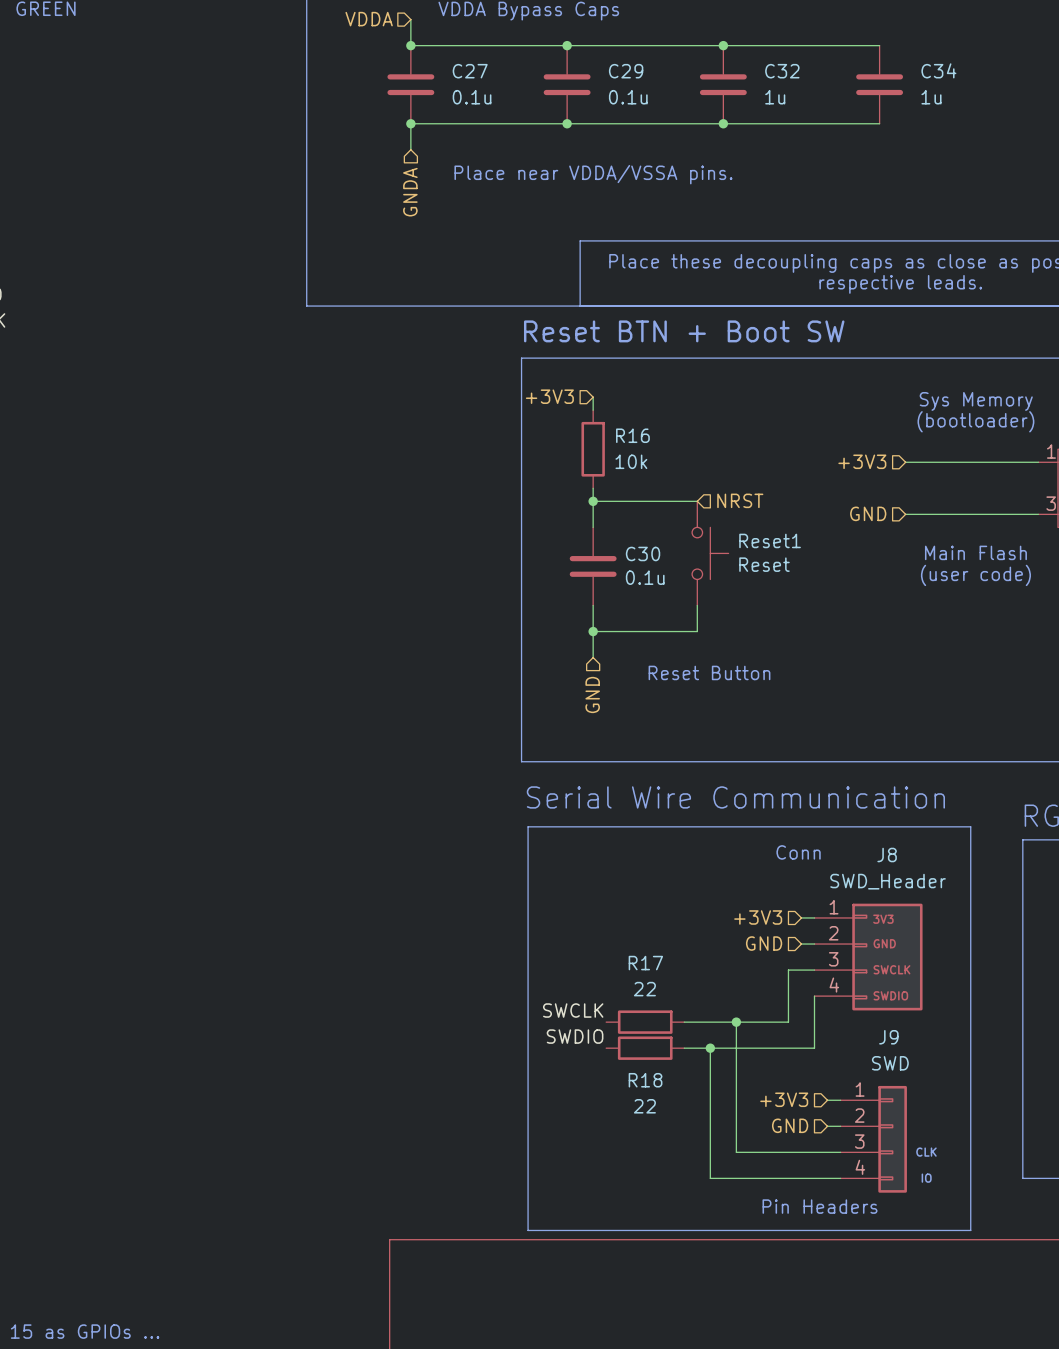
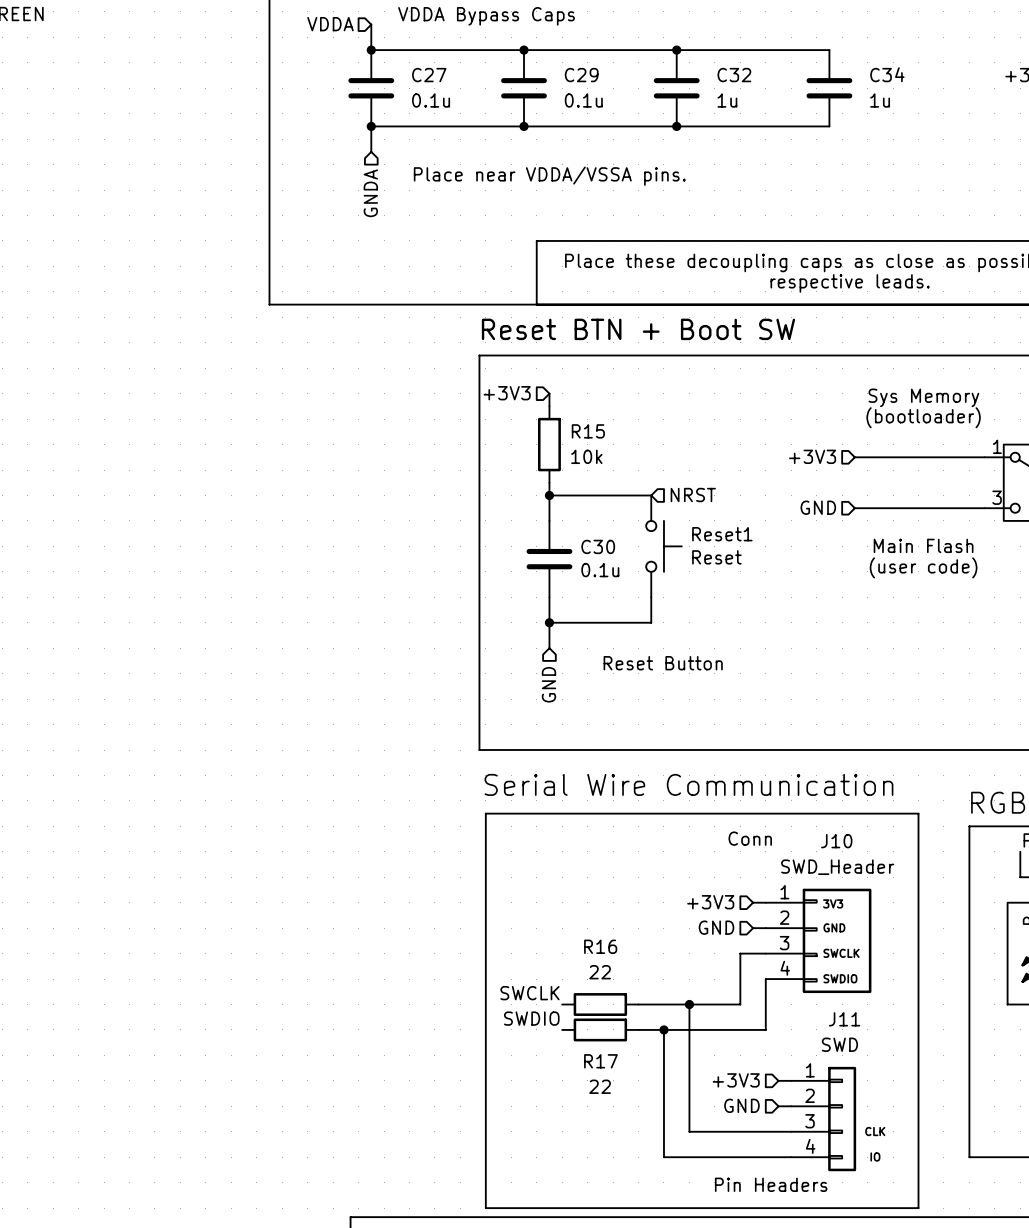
R16 name: R16 (632, 435) -> R15 (588, 431)
J8 name: J8 (887, 855) -> J10 (836, 841)
R17 name: R17 (645, 963) -> R16 (600, 946)
J9 name: J9 (888, 1037) -> J11 (844, 1019)
R18 name: R18 (645, 1080) -> R17 (600, 1061)

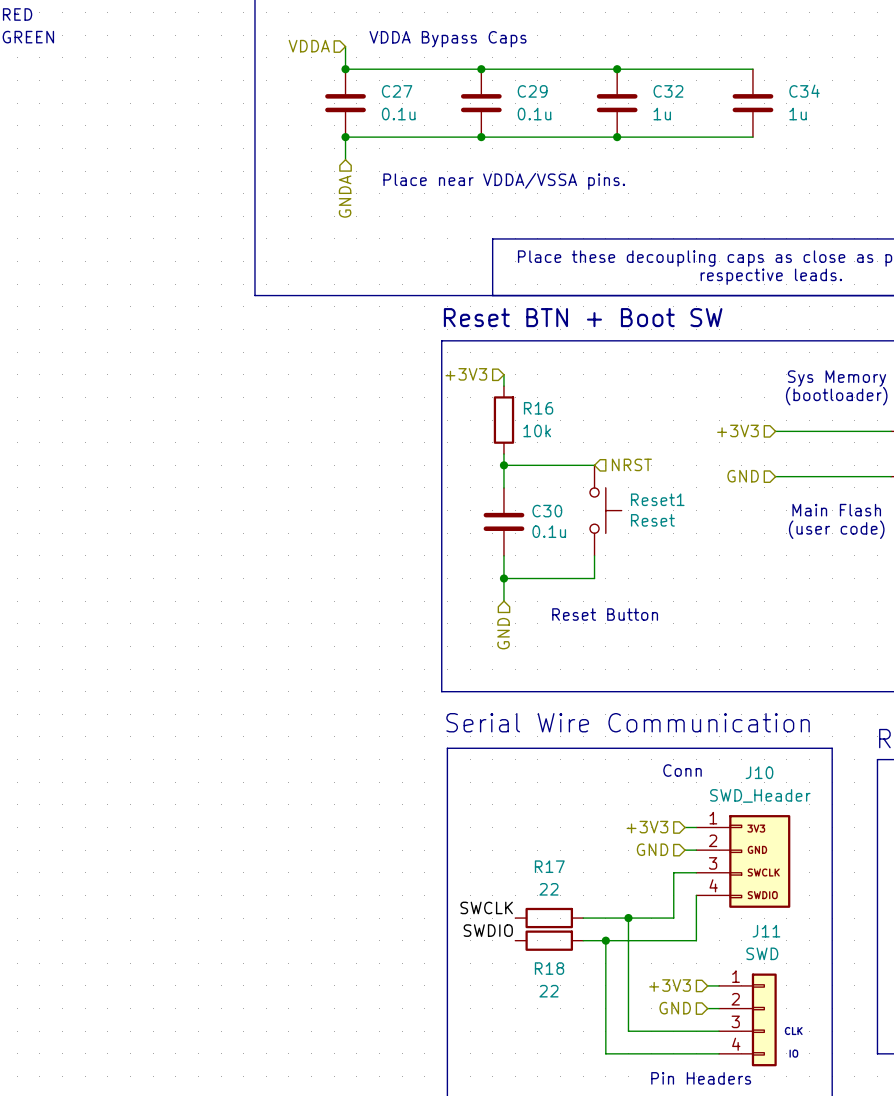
R15 name: R15 (588, 431) -> R16 (538, 408)
R16 name: R16 (600, 946) -> R17 (549, 866)
R17 name: R17 (600, 1061) -> R18 (549, 968)

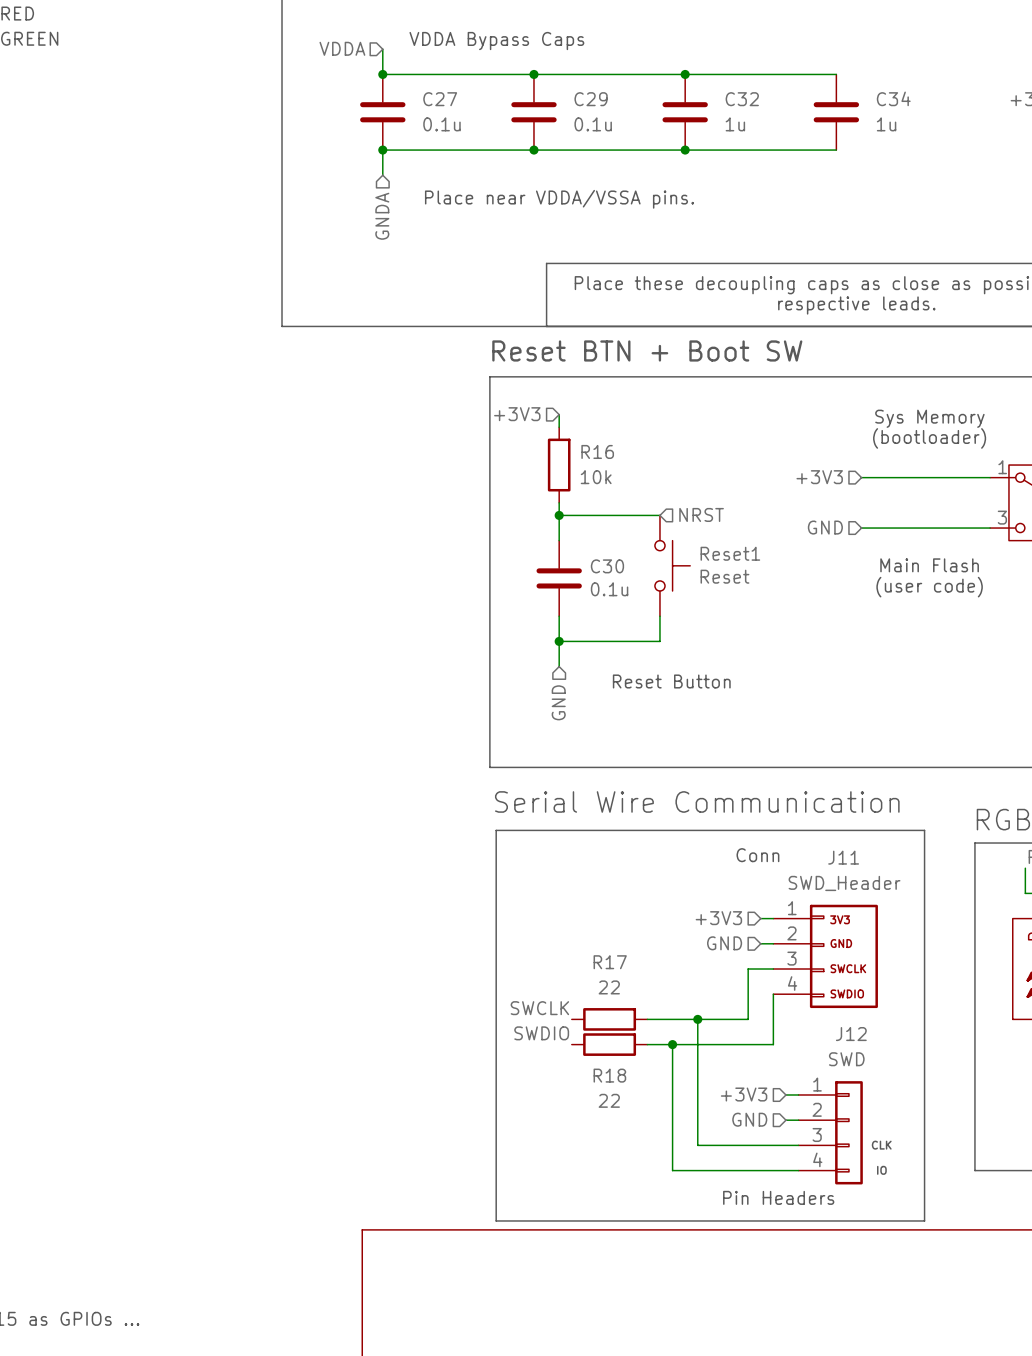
J10 name: J10 (759, 772) -> J11 (843, 857)
J11 name: J11 (766, 931) -> J12 (851, 1034)

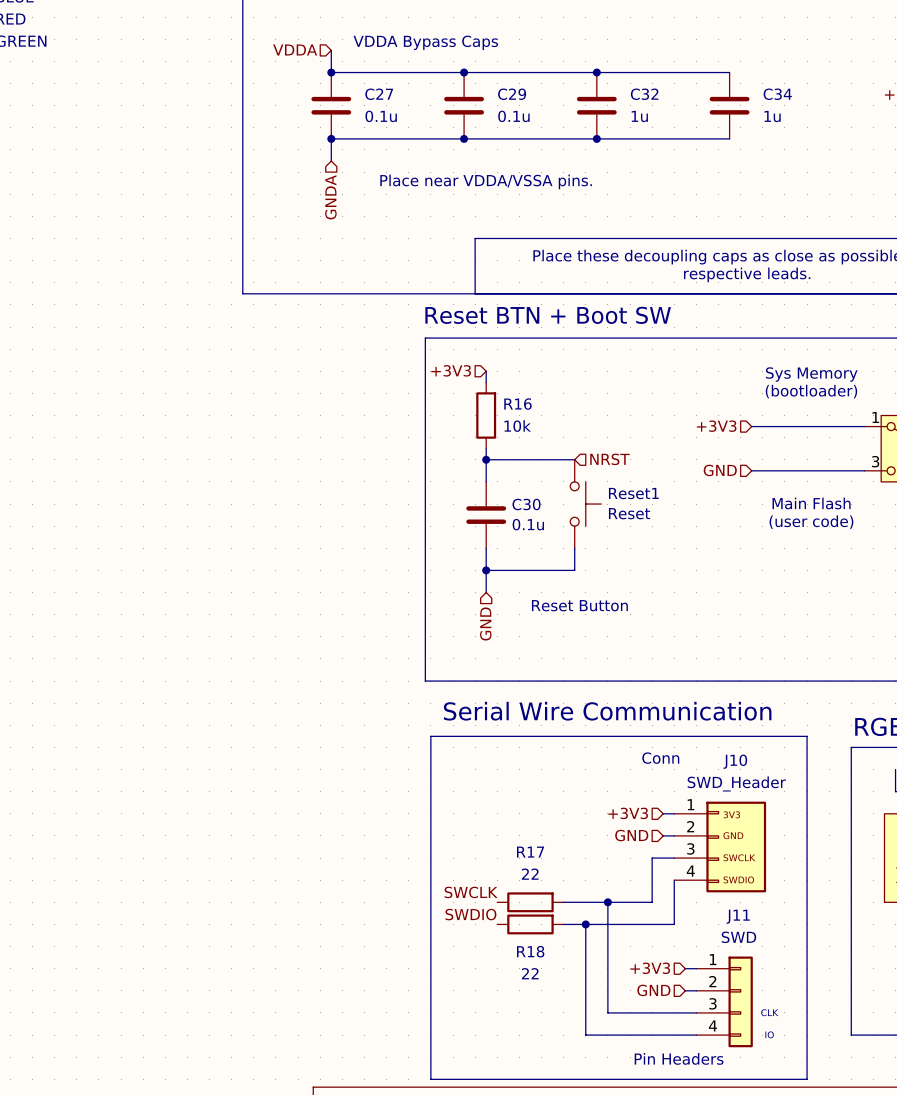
J11 name: J11 (843, 857) -> J10 (735, 761)
J12 name: J12 (851, 1034) -> J11 (738, 916)

